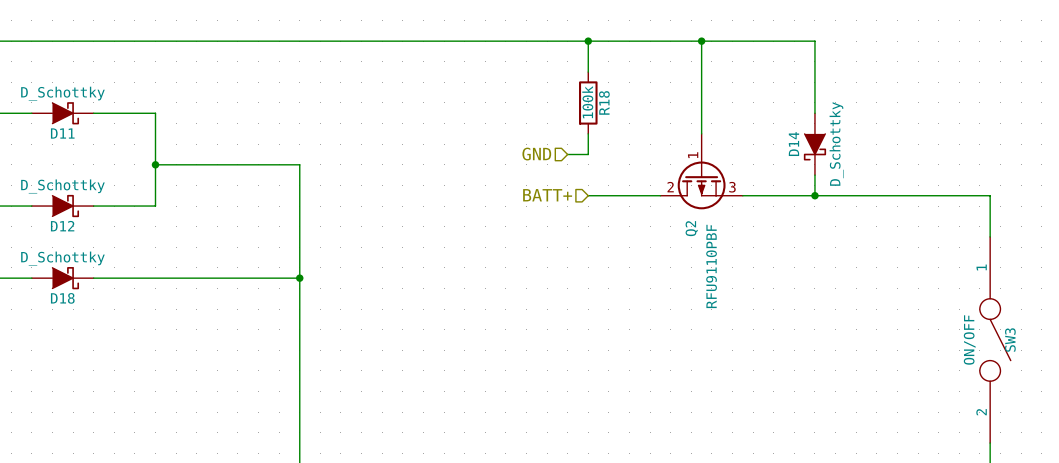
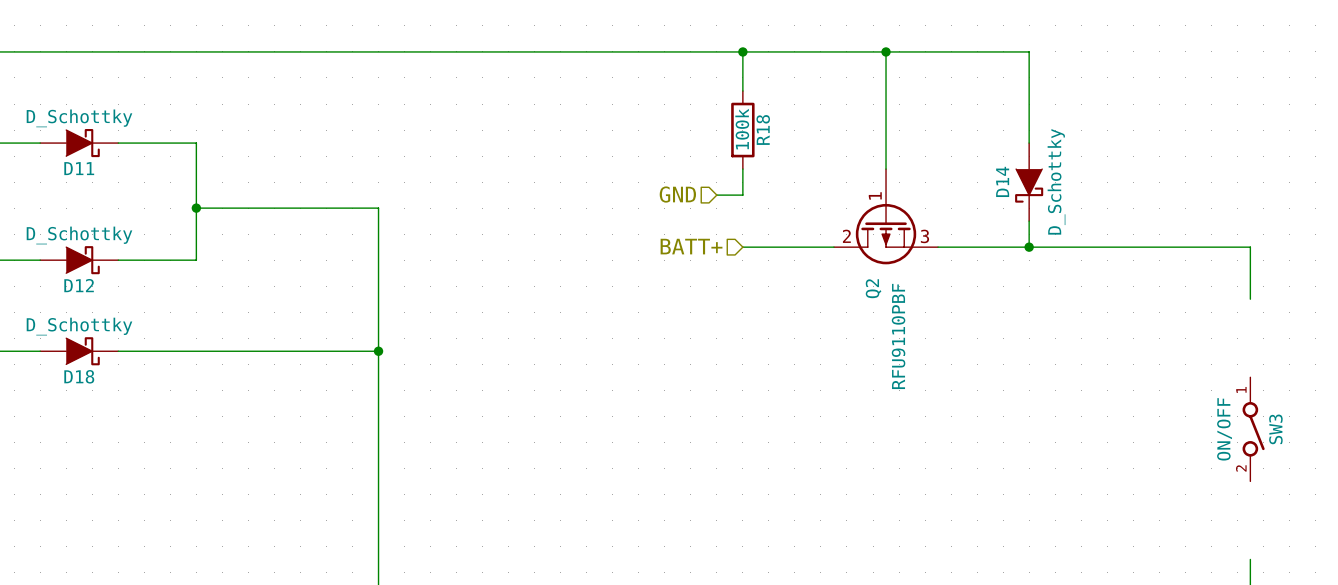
SW3 symbol: [979, 236, 1011, 444] -> [1242, 377, 1265, 482]

